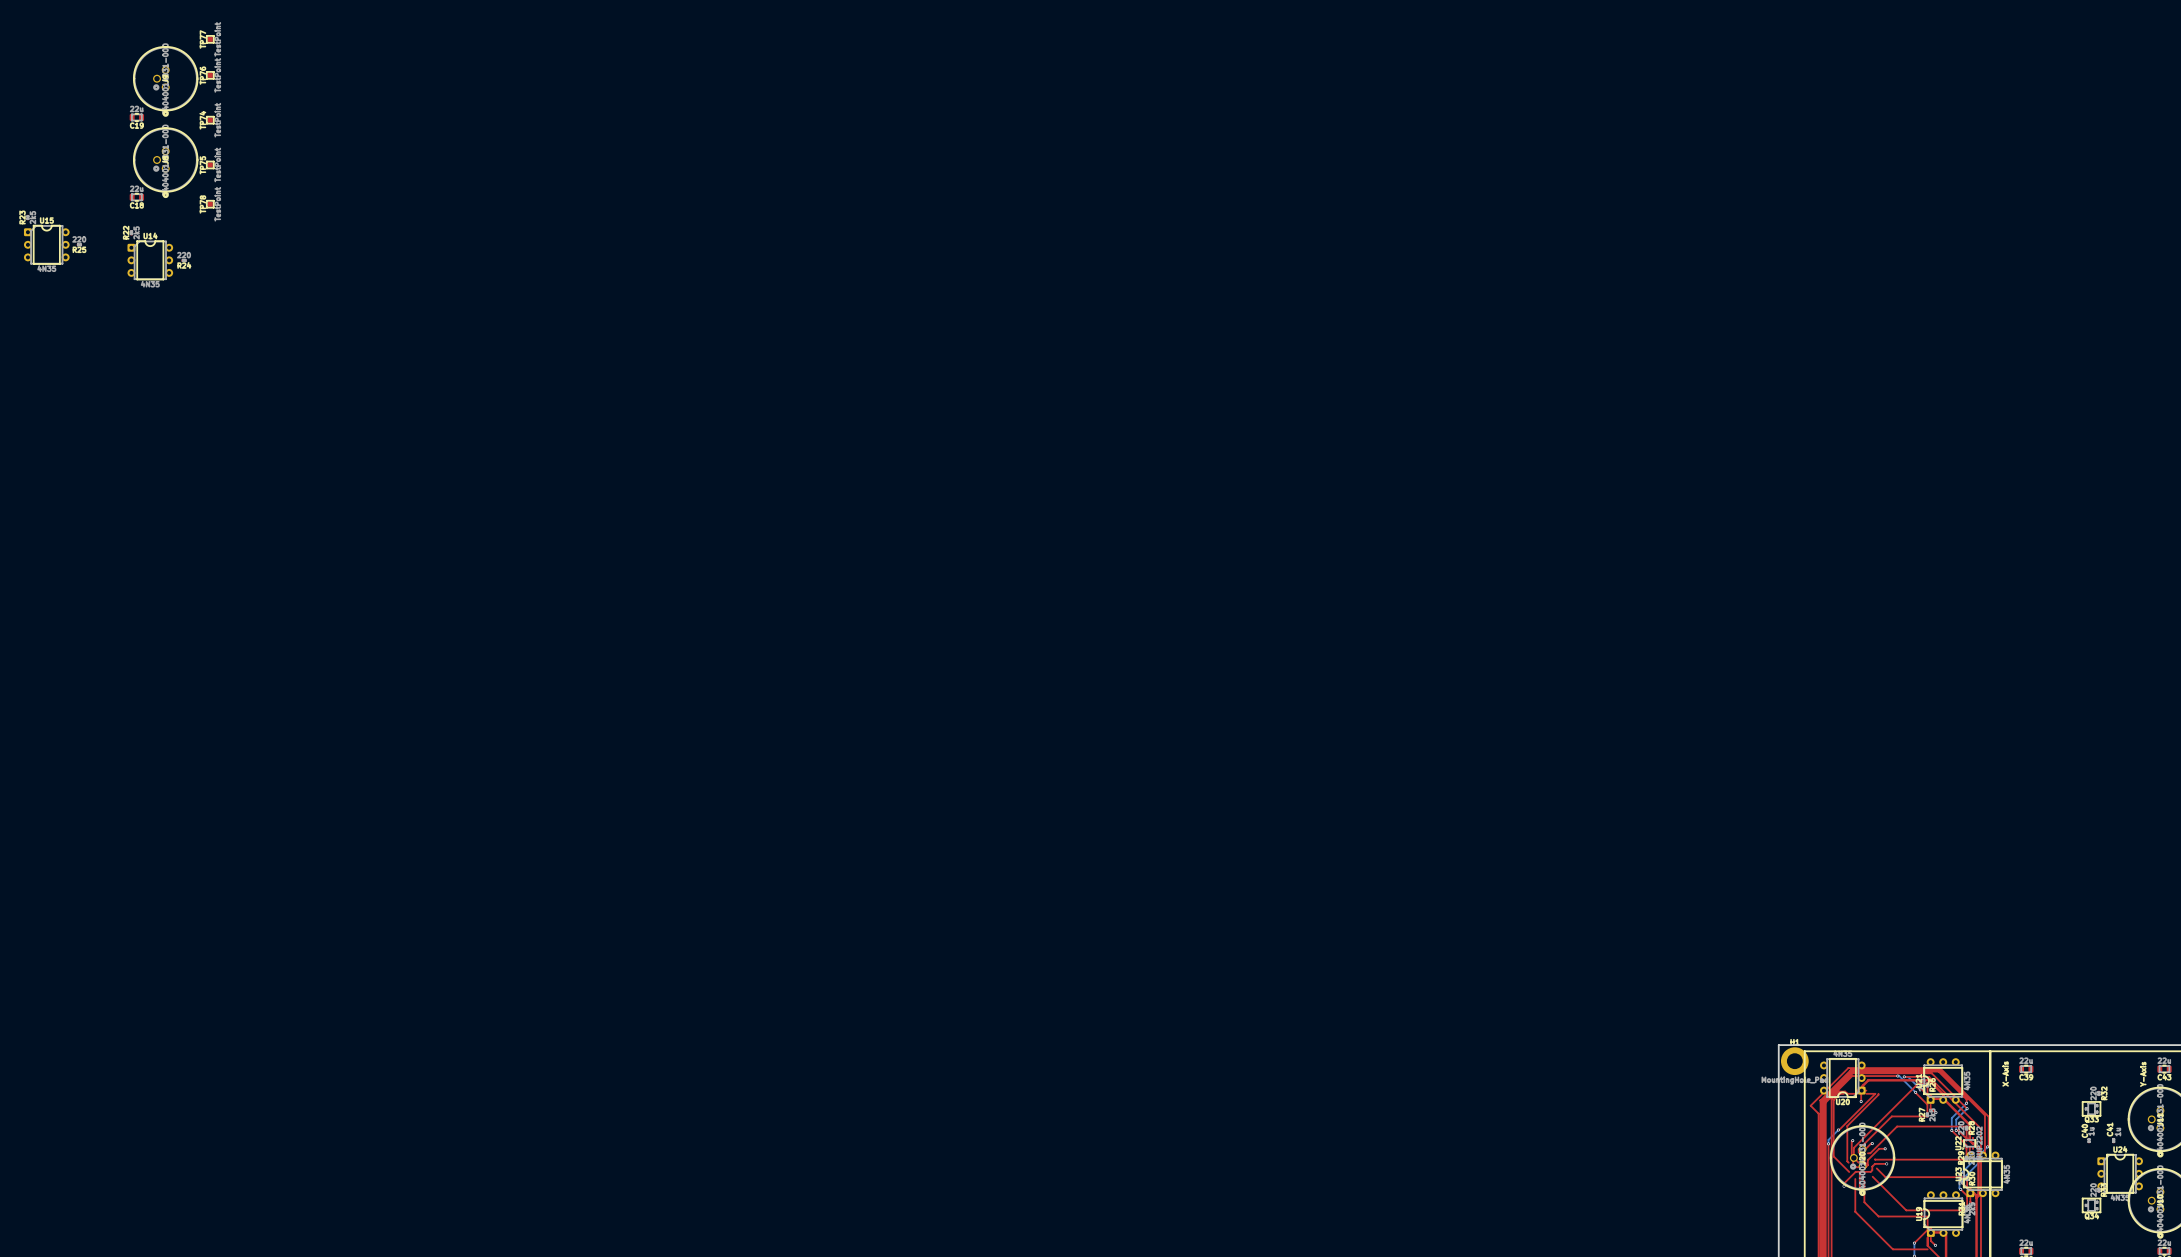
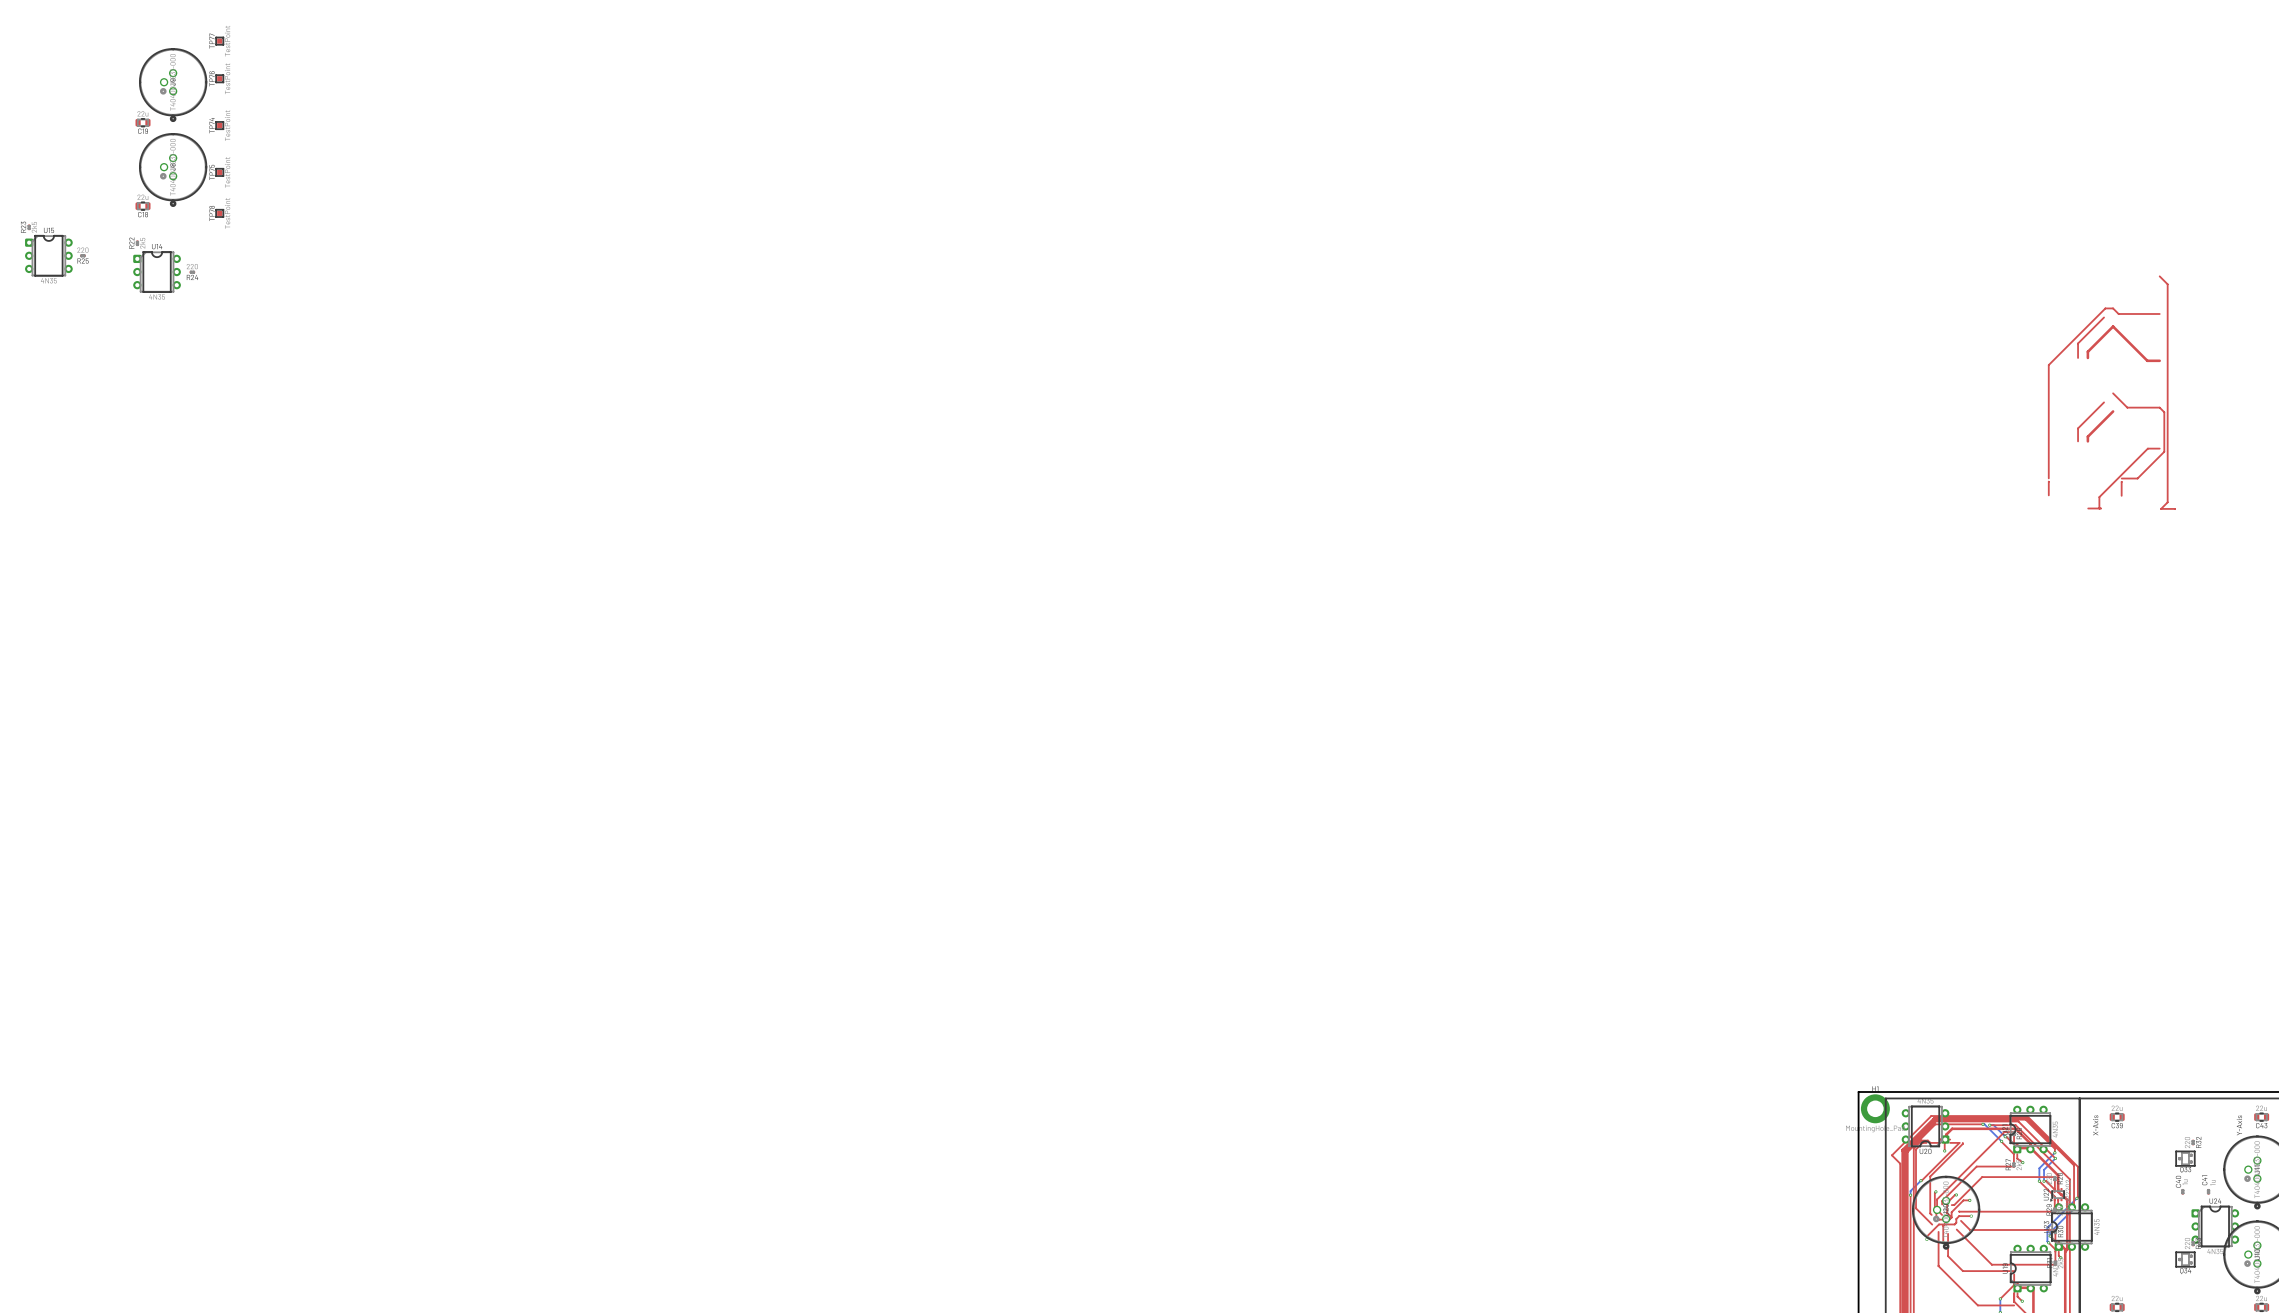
top track: none -> (2159, 276) (2167, 284) (2167, 502) (2161, 508) (2175, 509)
top track: none -> (2159, 313) (2118, 313) (2113, 308) (2105, 308) (2048, 365) (2048, 478)
top track: none -> (2104, 317) (2078, 343) (2078, 357)
top track: none -> (2087, 357) (2087, 351) (2113, 326) (2147, 360) (2159, 360)
top track: none -> (2113, 393) (2127, 407) (2159, 407) (2164, 412) (2164, 451) (2137, 478) (2121, 478)
top track: none -> (2104, 402) (2078, 428) (2078, 441)
top track: none -> (2113, 411) (2087, 436) (2087, 441)
top track: none -> (2159, 448) (2147, 448) (2099, 497) (2099, 508)
top track: none -> (2048, 481) (2048, 495)
top track: none -> (2121, 481) (2121, 495)
top track: none -> (2088, 508) (2100, 508)

